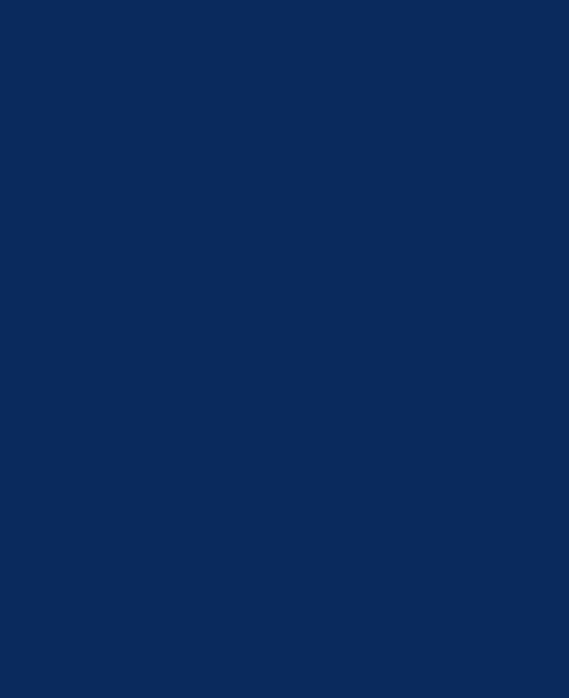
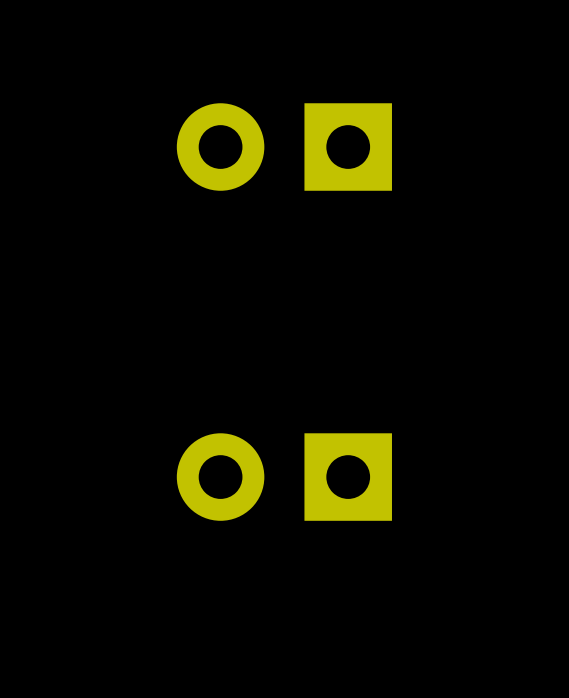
part: none -> (284, 147)
part: none -> (284, 477)

